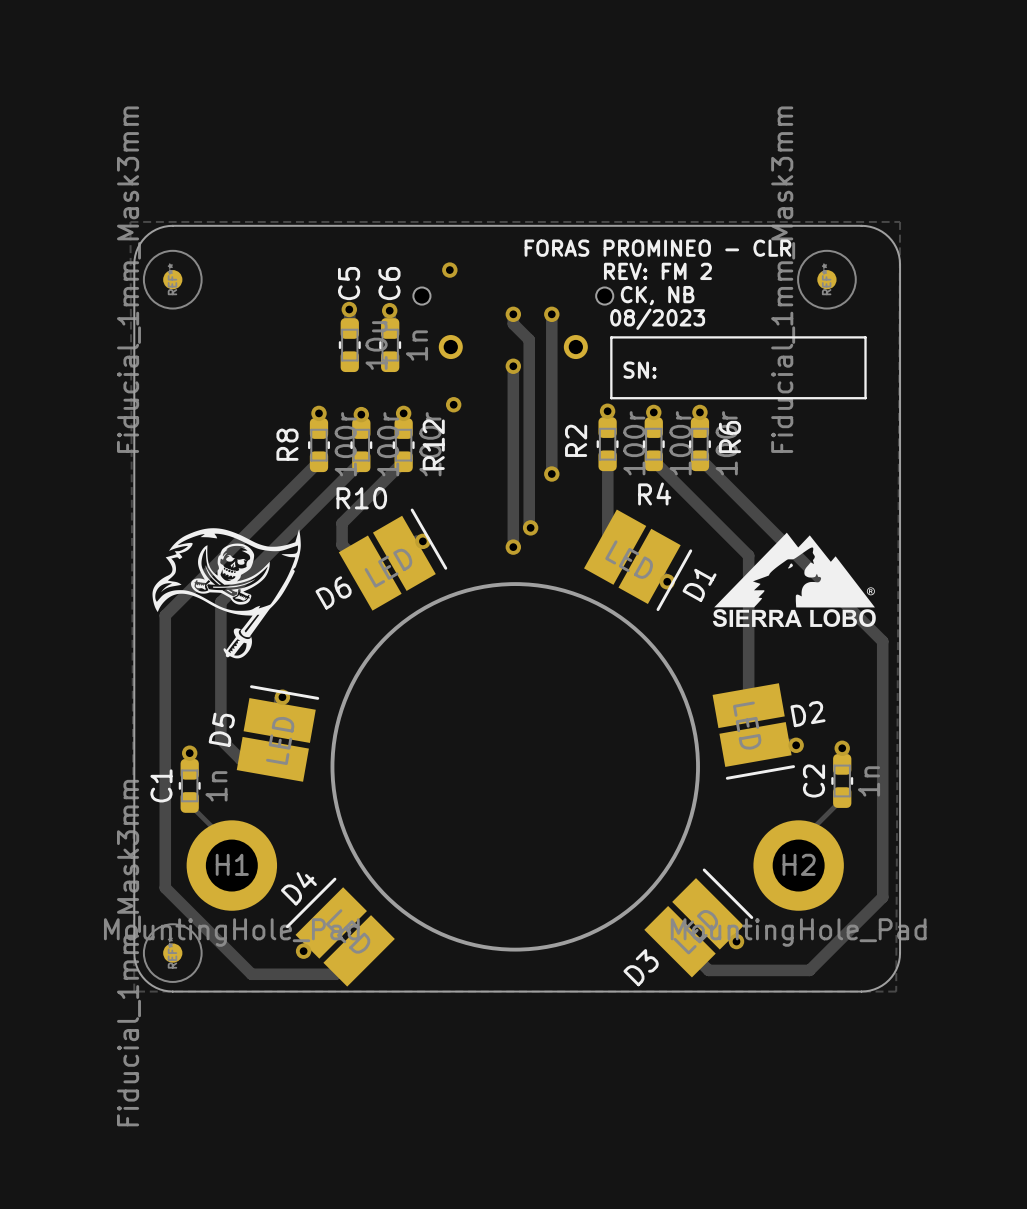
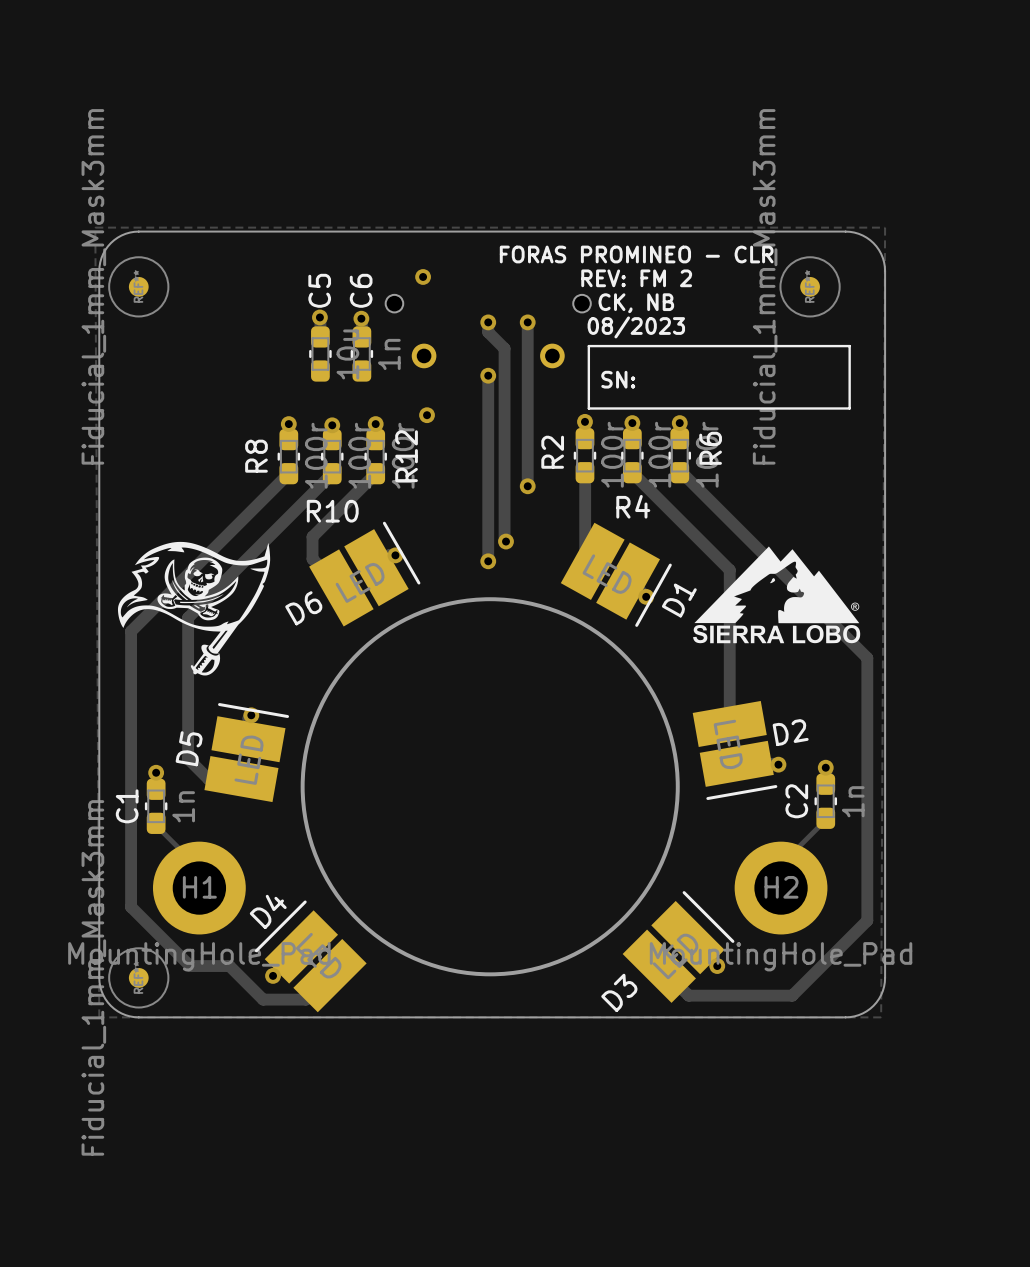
track: (165, 884) (165, 887) (251, 974) (293, 974) -> (131, 907) (190, 966) (229, 966) (263, 999)

